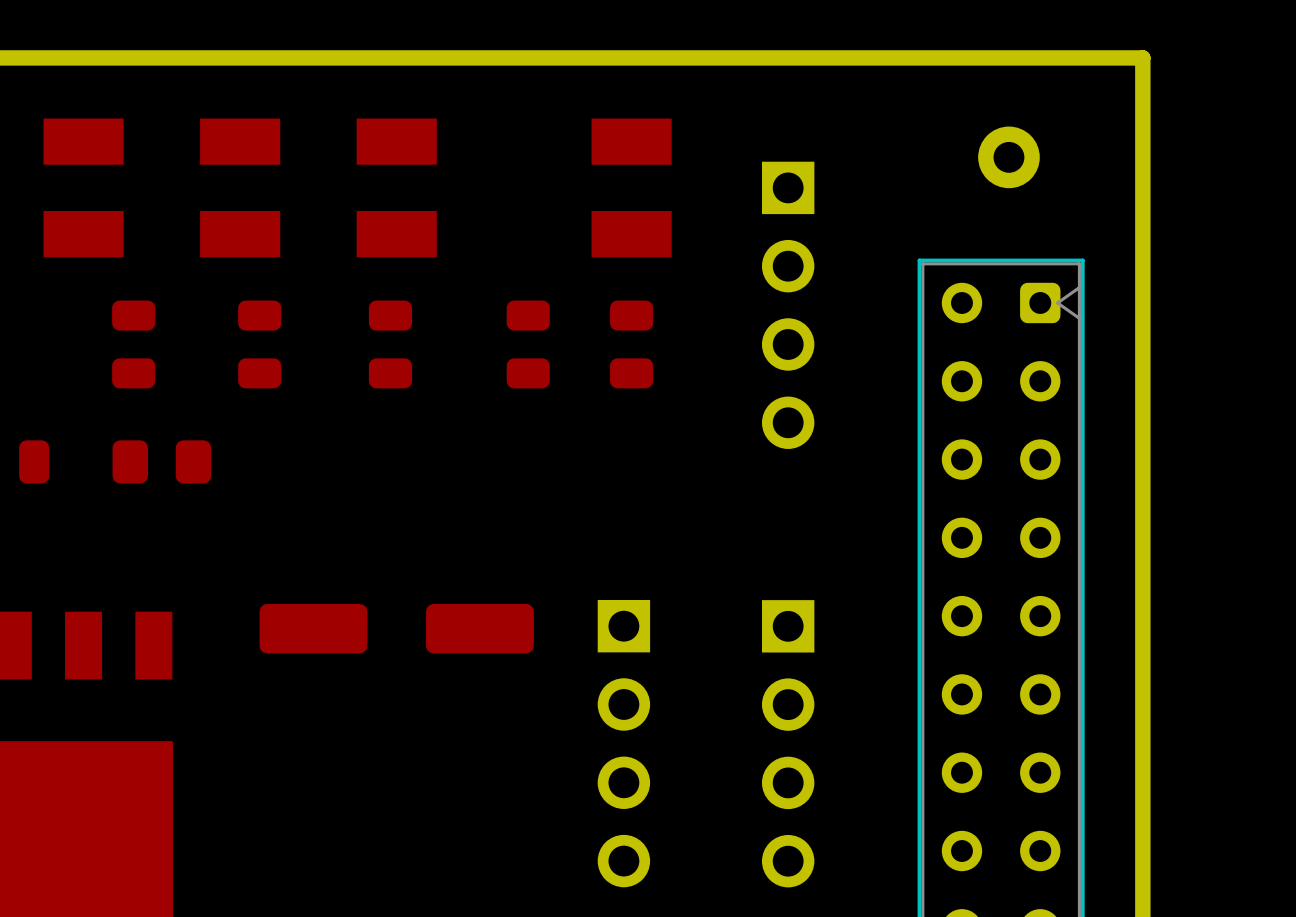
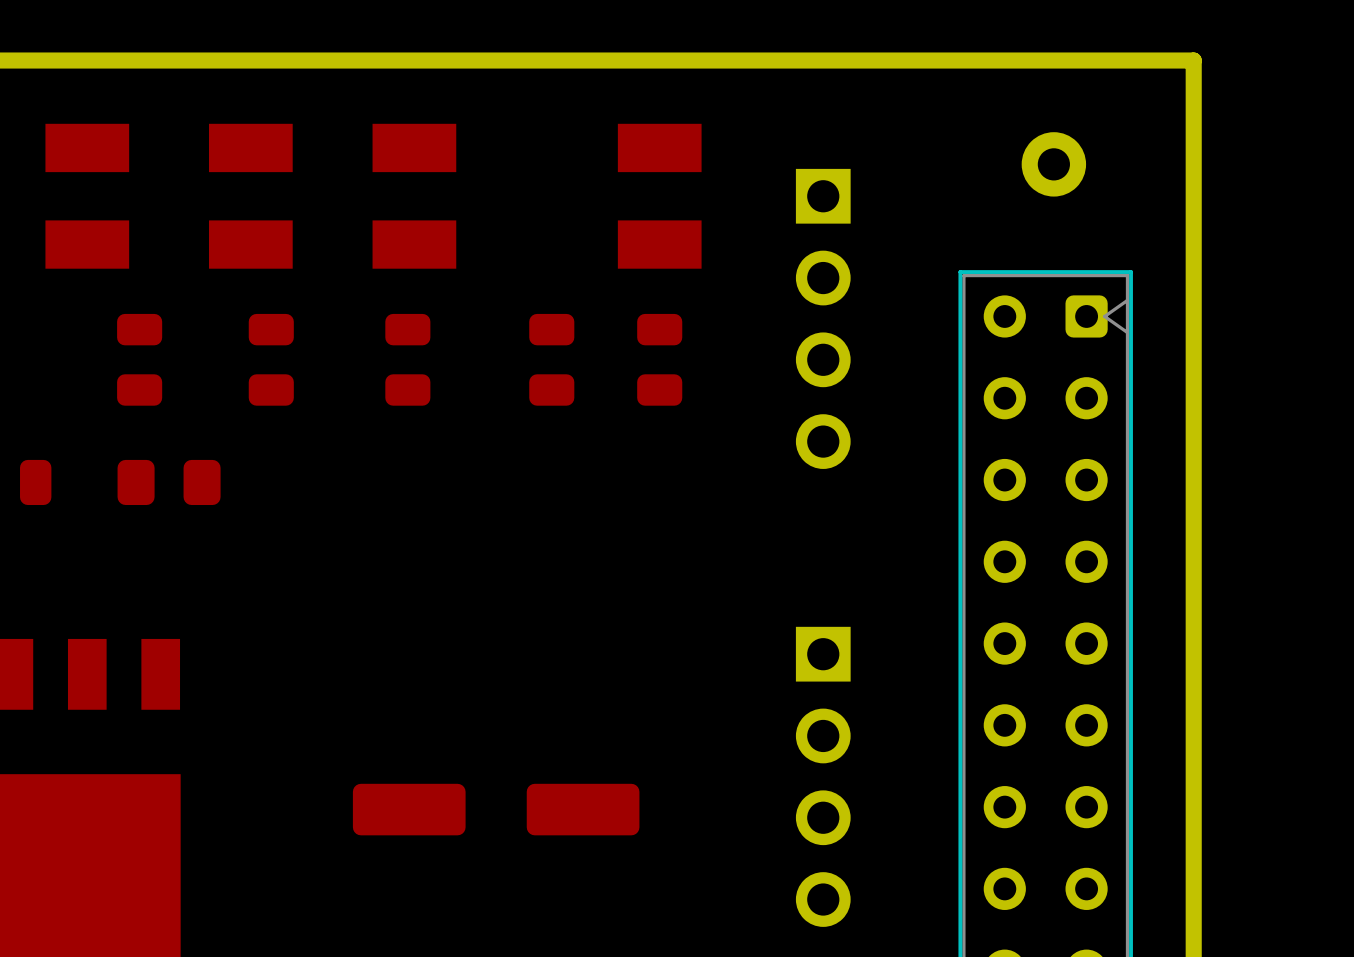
part position: (396, 628) -> (496, 809)
part: (623, 743) -> none

